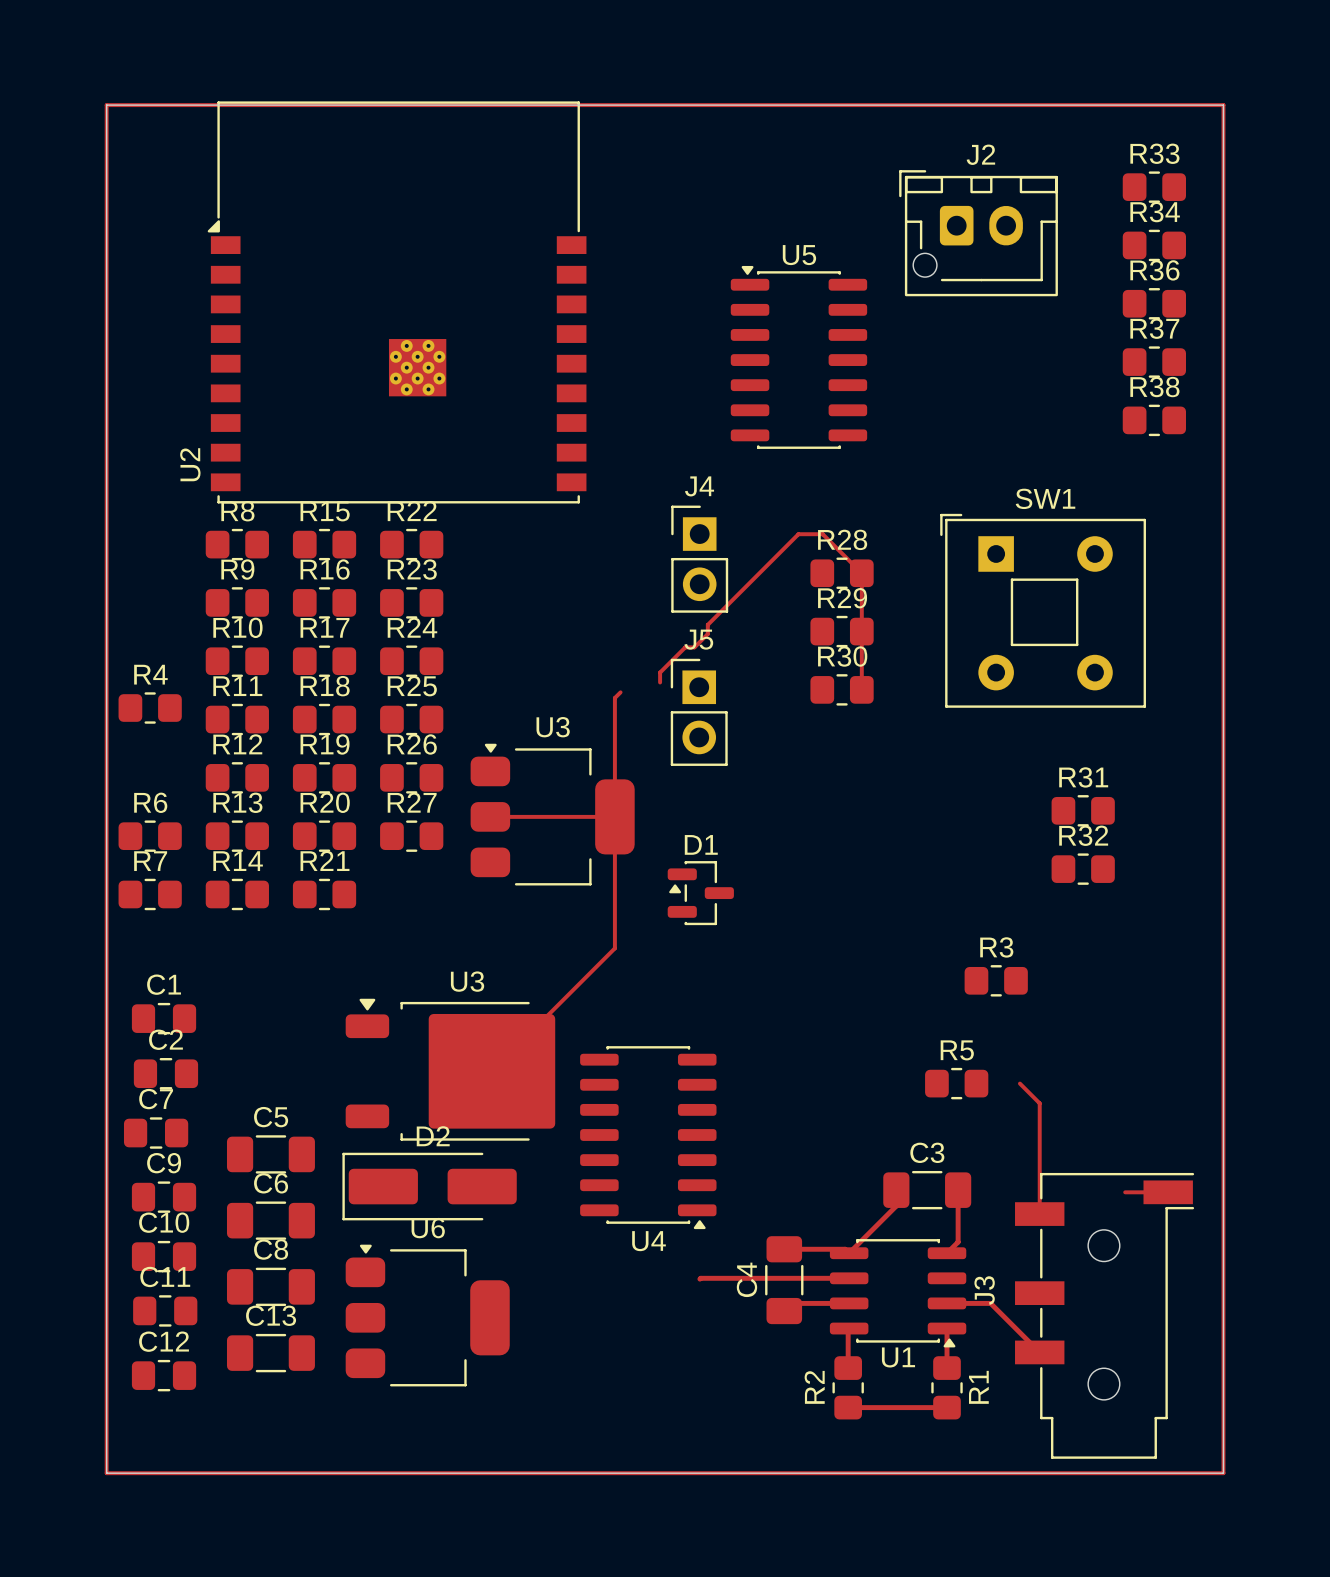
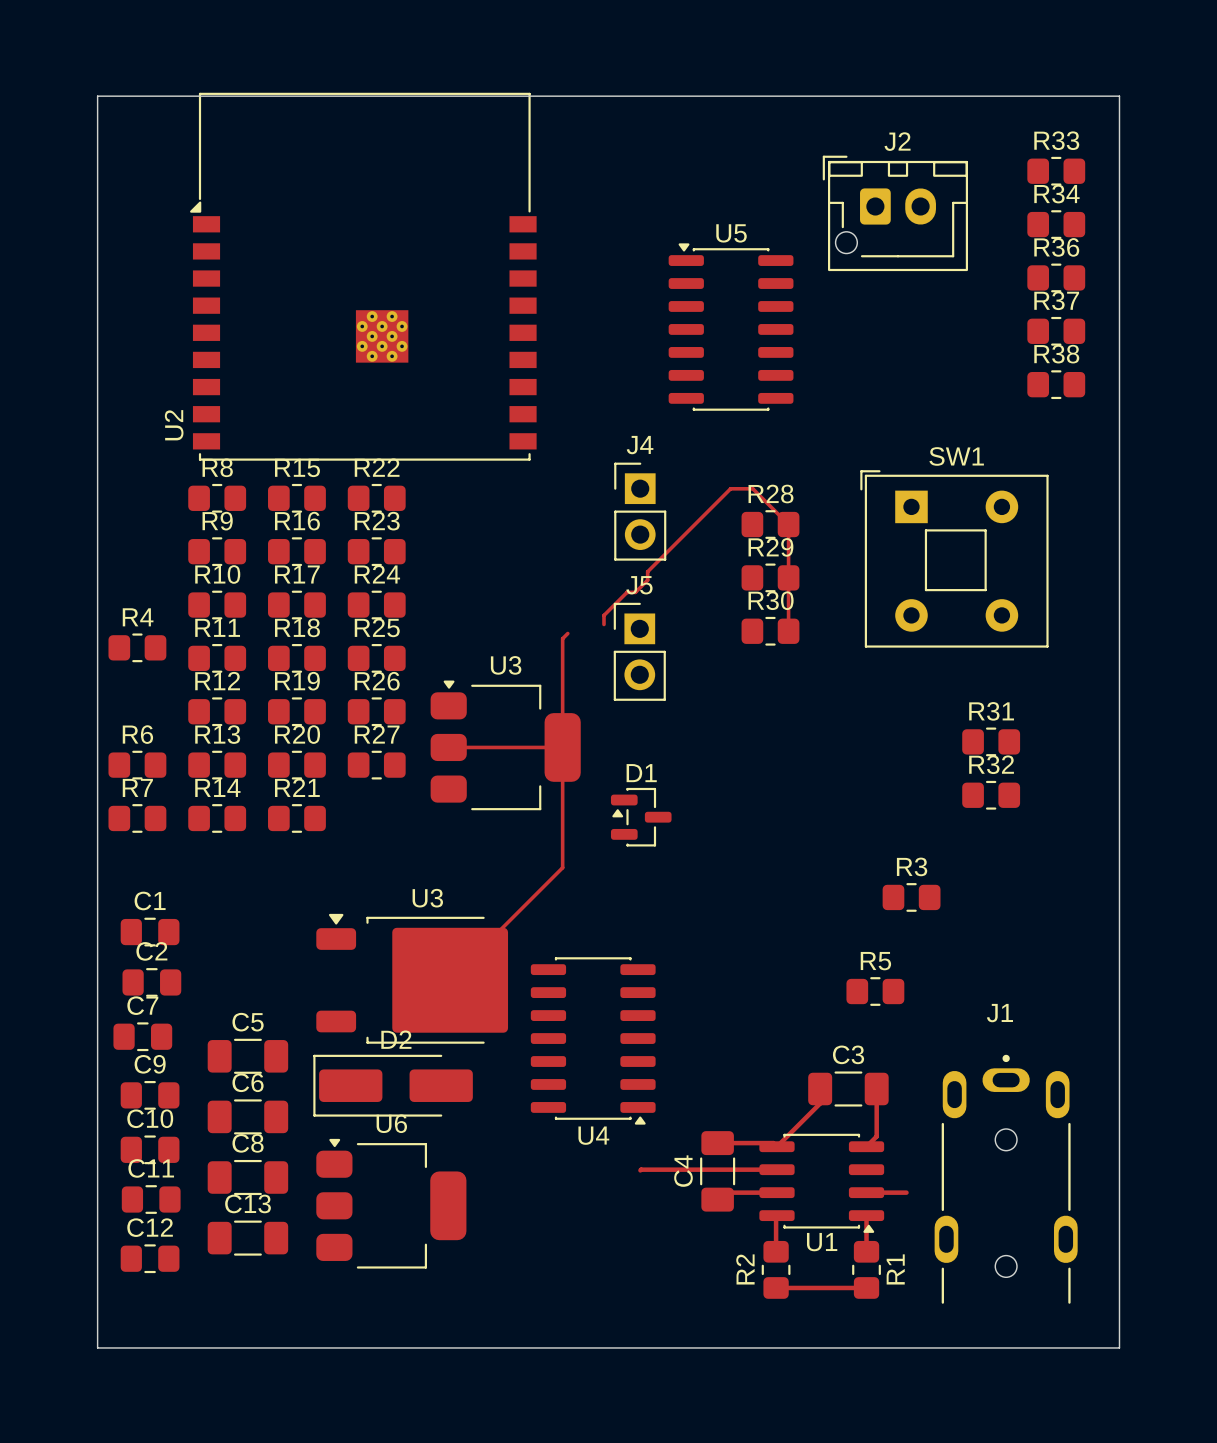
top track: (106, 105) (1223, 105) (1223, 1473) (106, 1473) (106, 105) -> none
top track: (1019, 1083) (1039, 1103) (1039, 1214) -> none
top track: (1125, 1192) (1168, 1192) -> none
J1: none -> (1006, 1179)
top track: (990, 1303) (1039, 1352) -> none
J3: (1104, 1315) -> none

